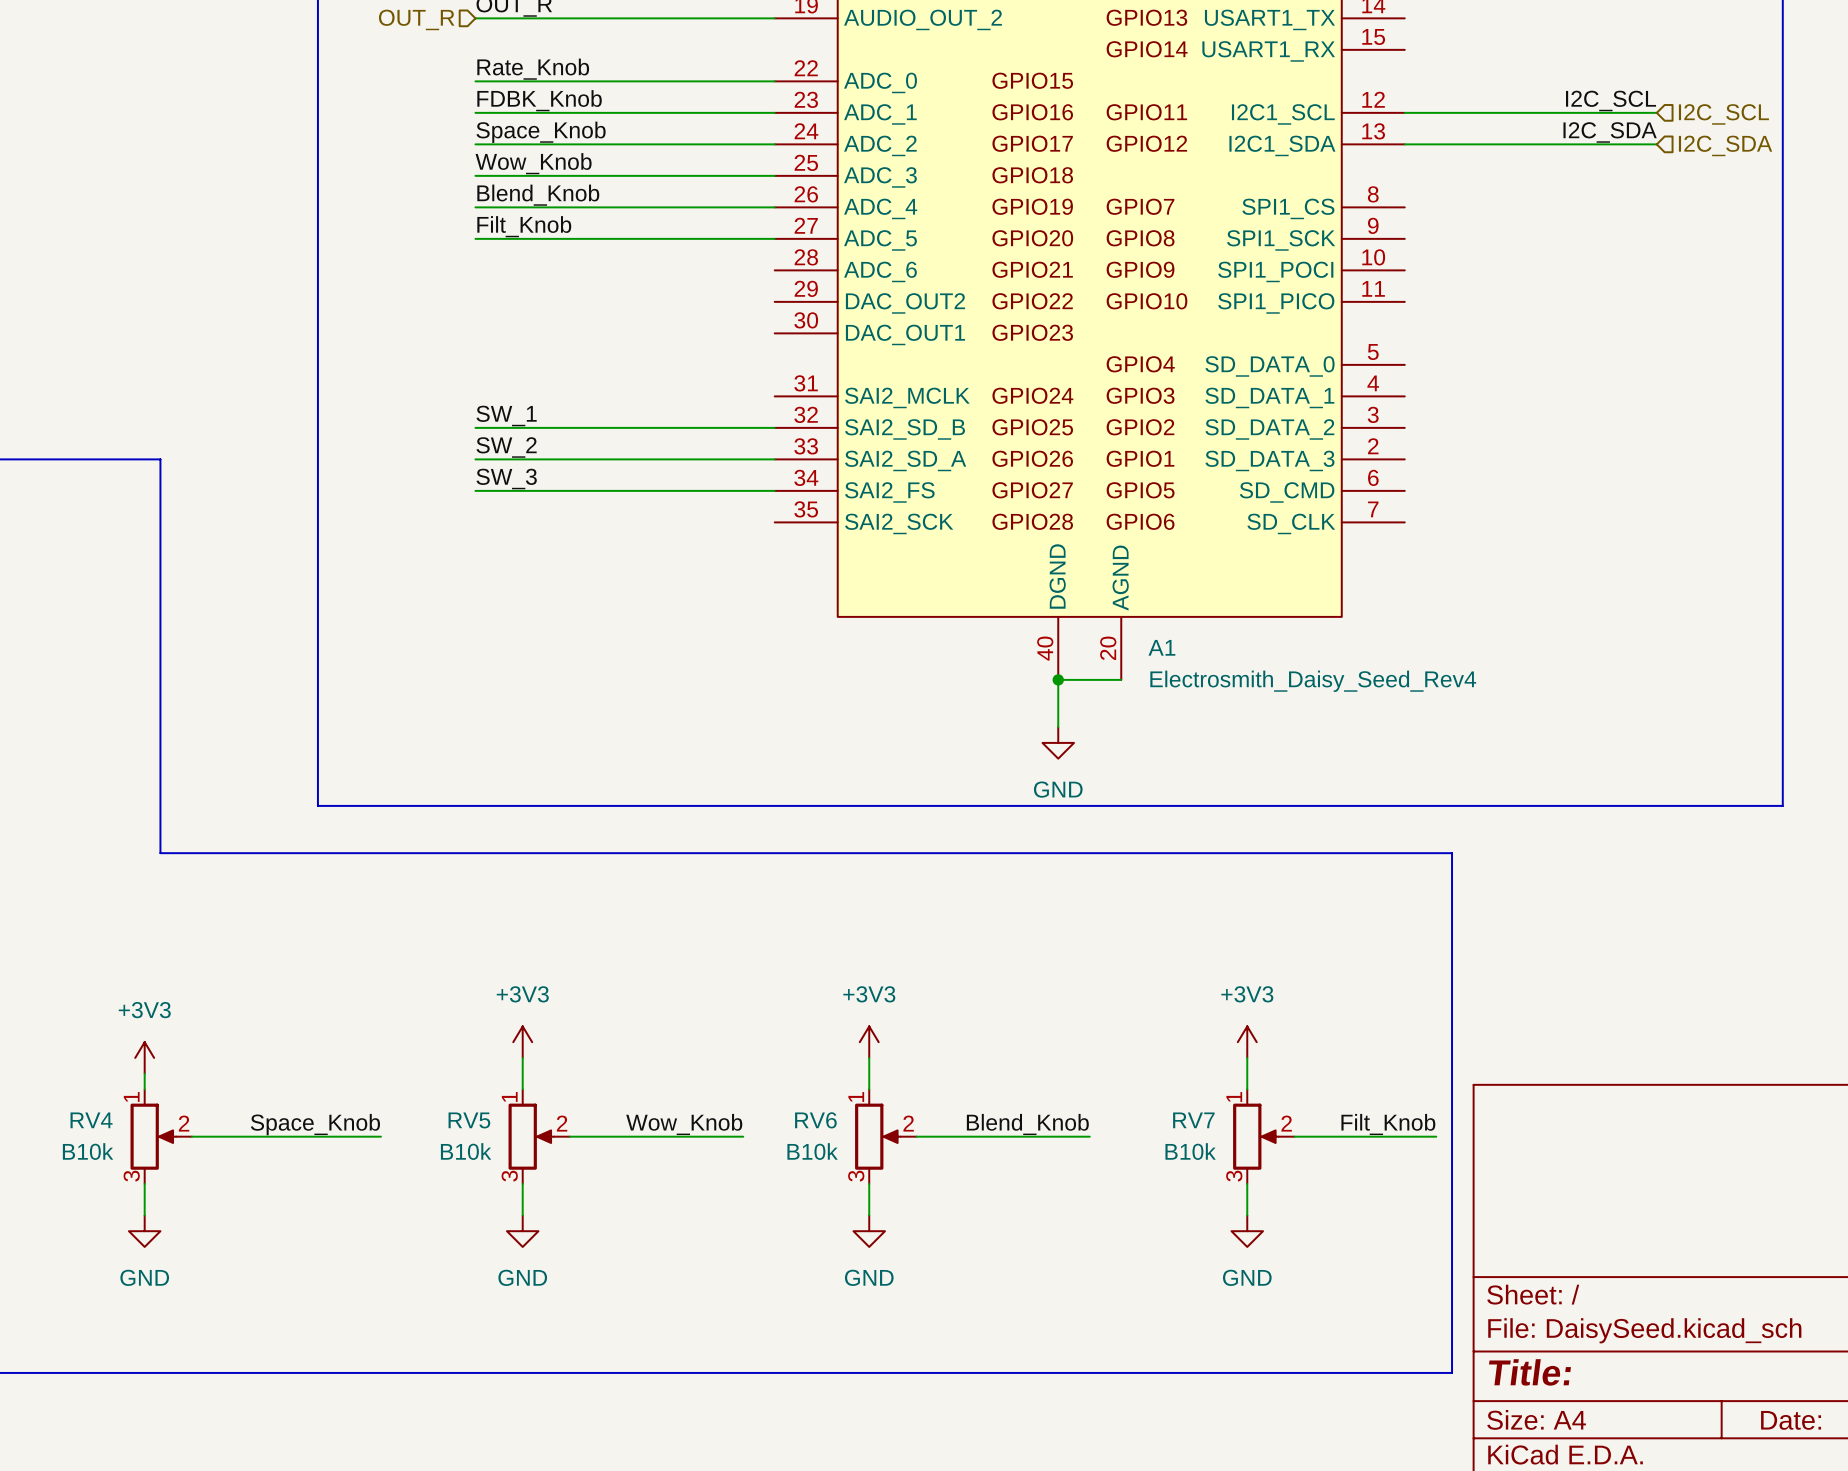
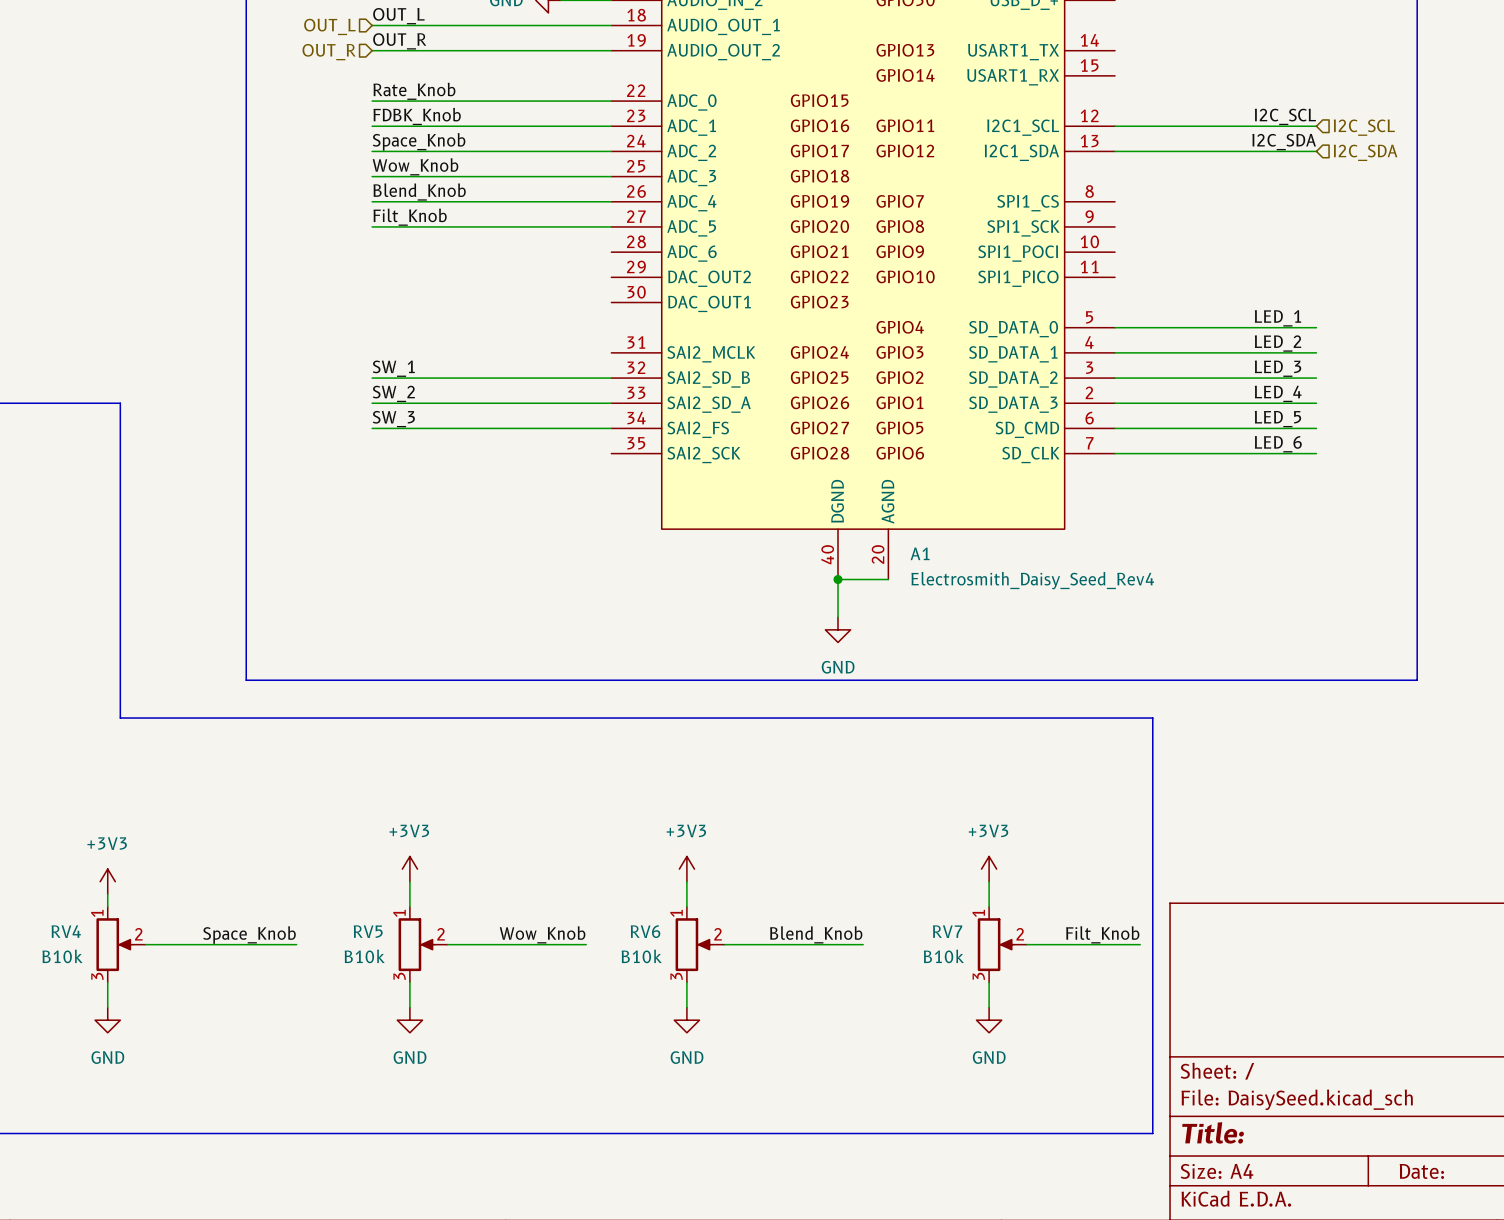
label: none -> LED_1 (1277, 318)
wire: none -> (1115, 327) (1316, 327)
label: none -> LED_2 (1278, 343)
wire: none -> (1115, 352) (1316, 352)
label: none -> LED_3 (1278, 368)
wire: none -> (1115, 378) (1316, 378)
label: none -> LED_4 (1278, 393)
wire: none -> (1115, 403) (1316, 403)
label: none -> LED_5 (1277, 419)
wire: none -> (1115, 428) (1316, 428)
label: none -> LED_6 (1278, 444)
wire: none -> (1115, 453) (1316, 453)

